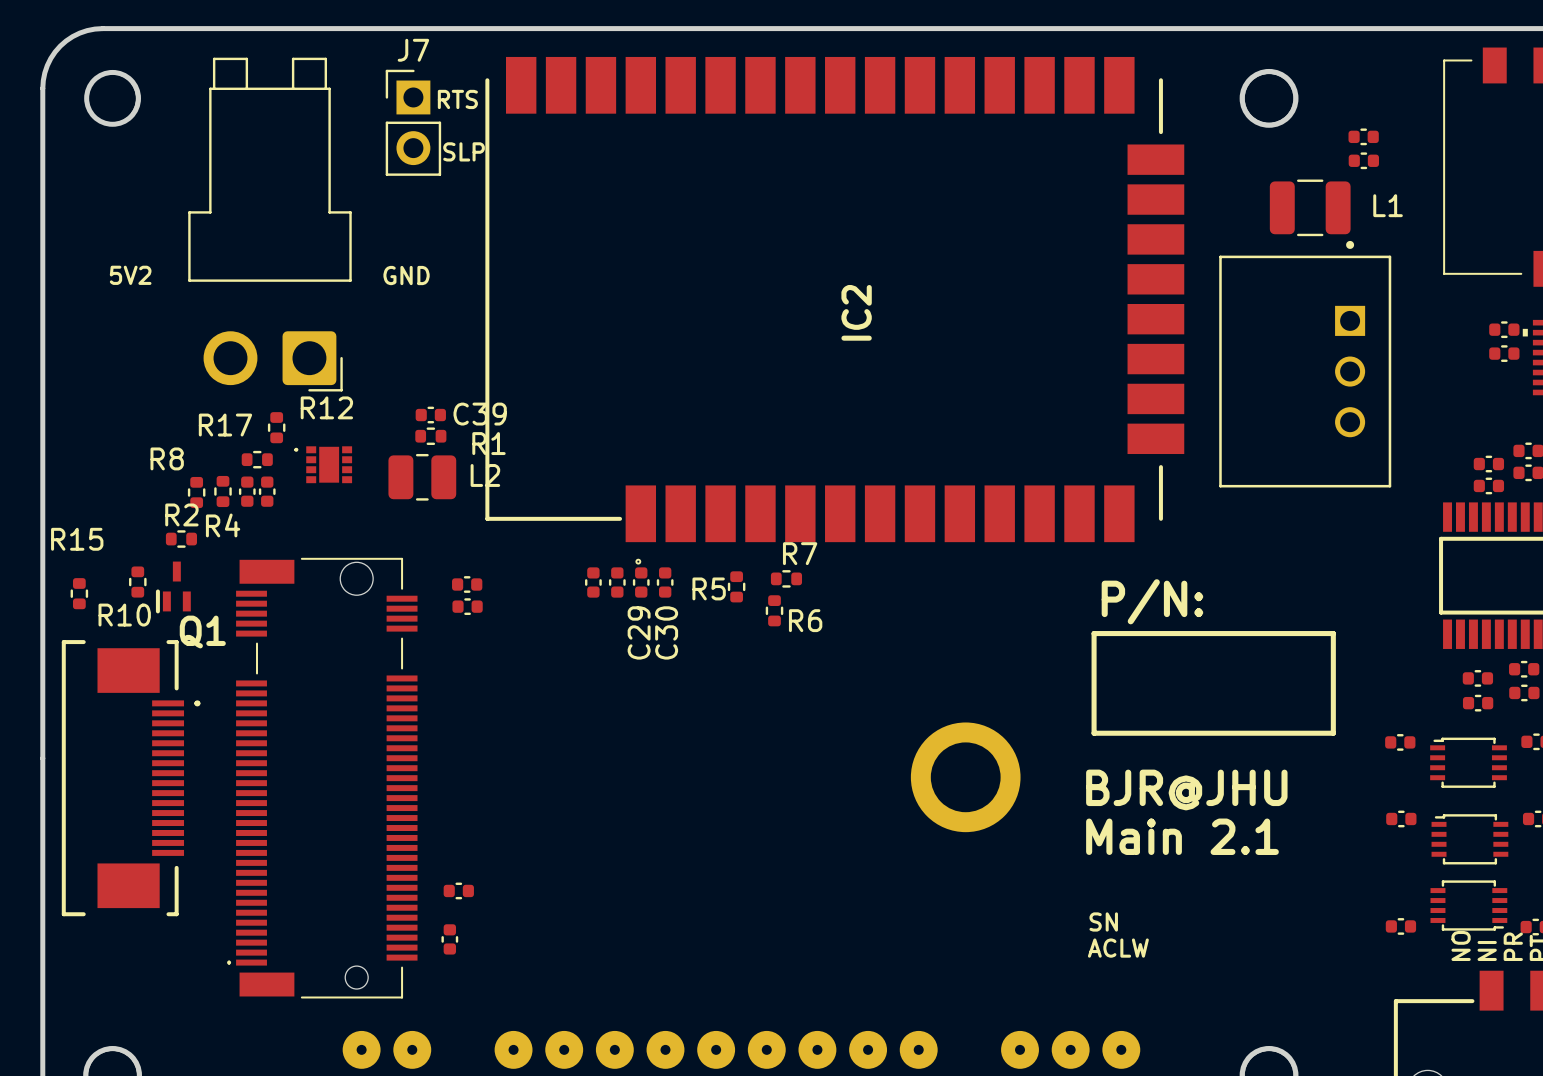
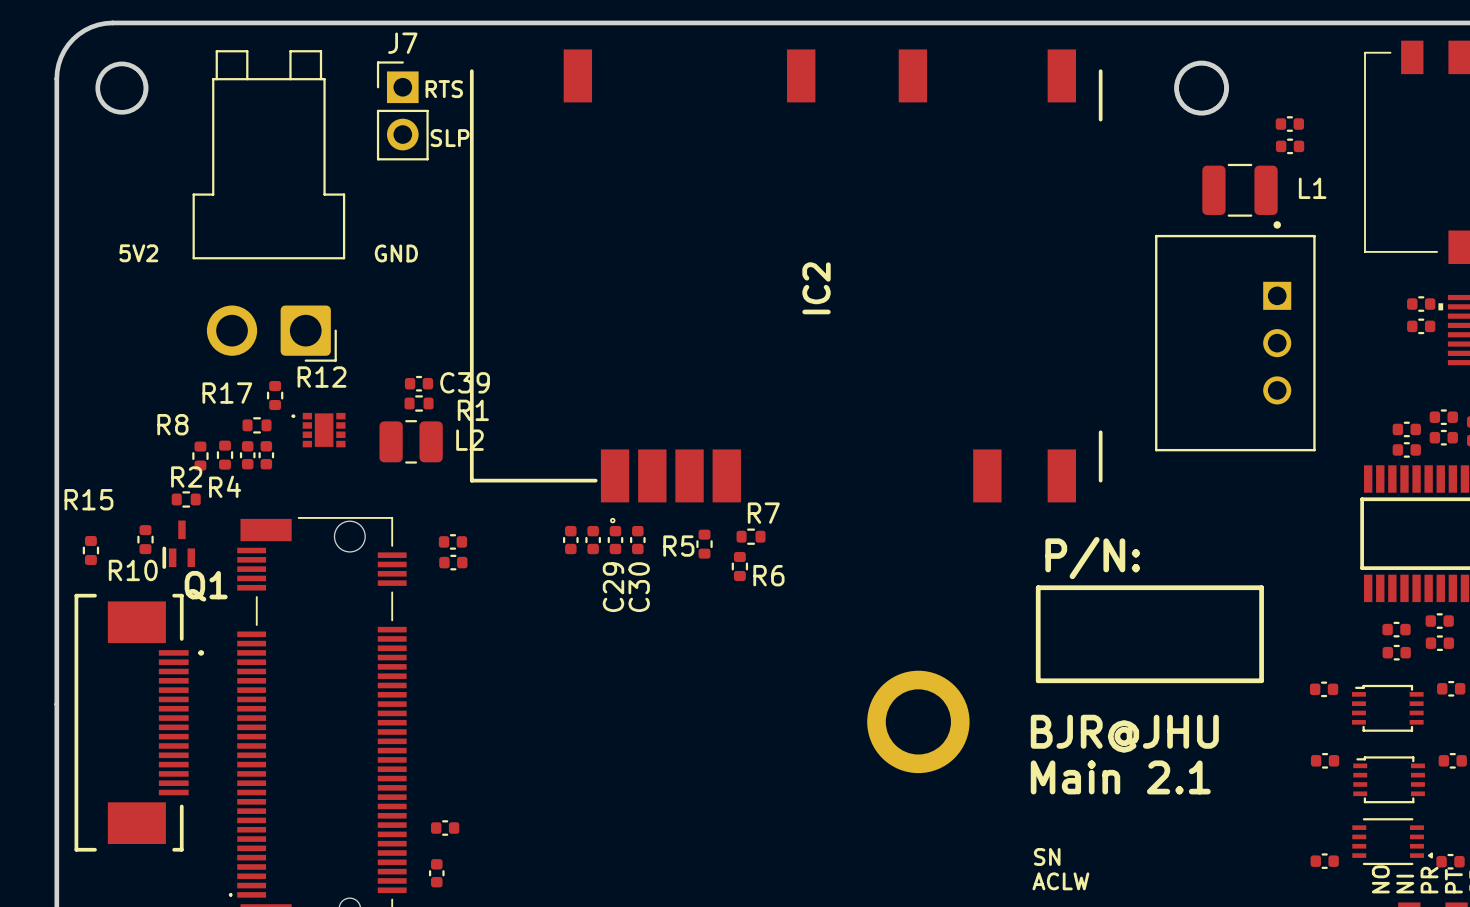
IC2 footprint: [485, 56, 1185, 565] -> [469, 49, 1103, 524]
part footprint: [1430, 880, 1508, 931] -> [1352, 818, 1433, 866]

